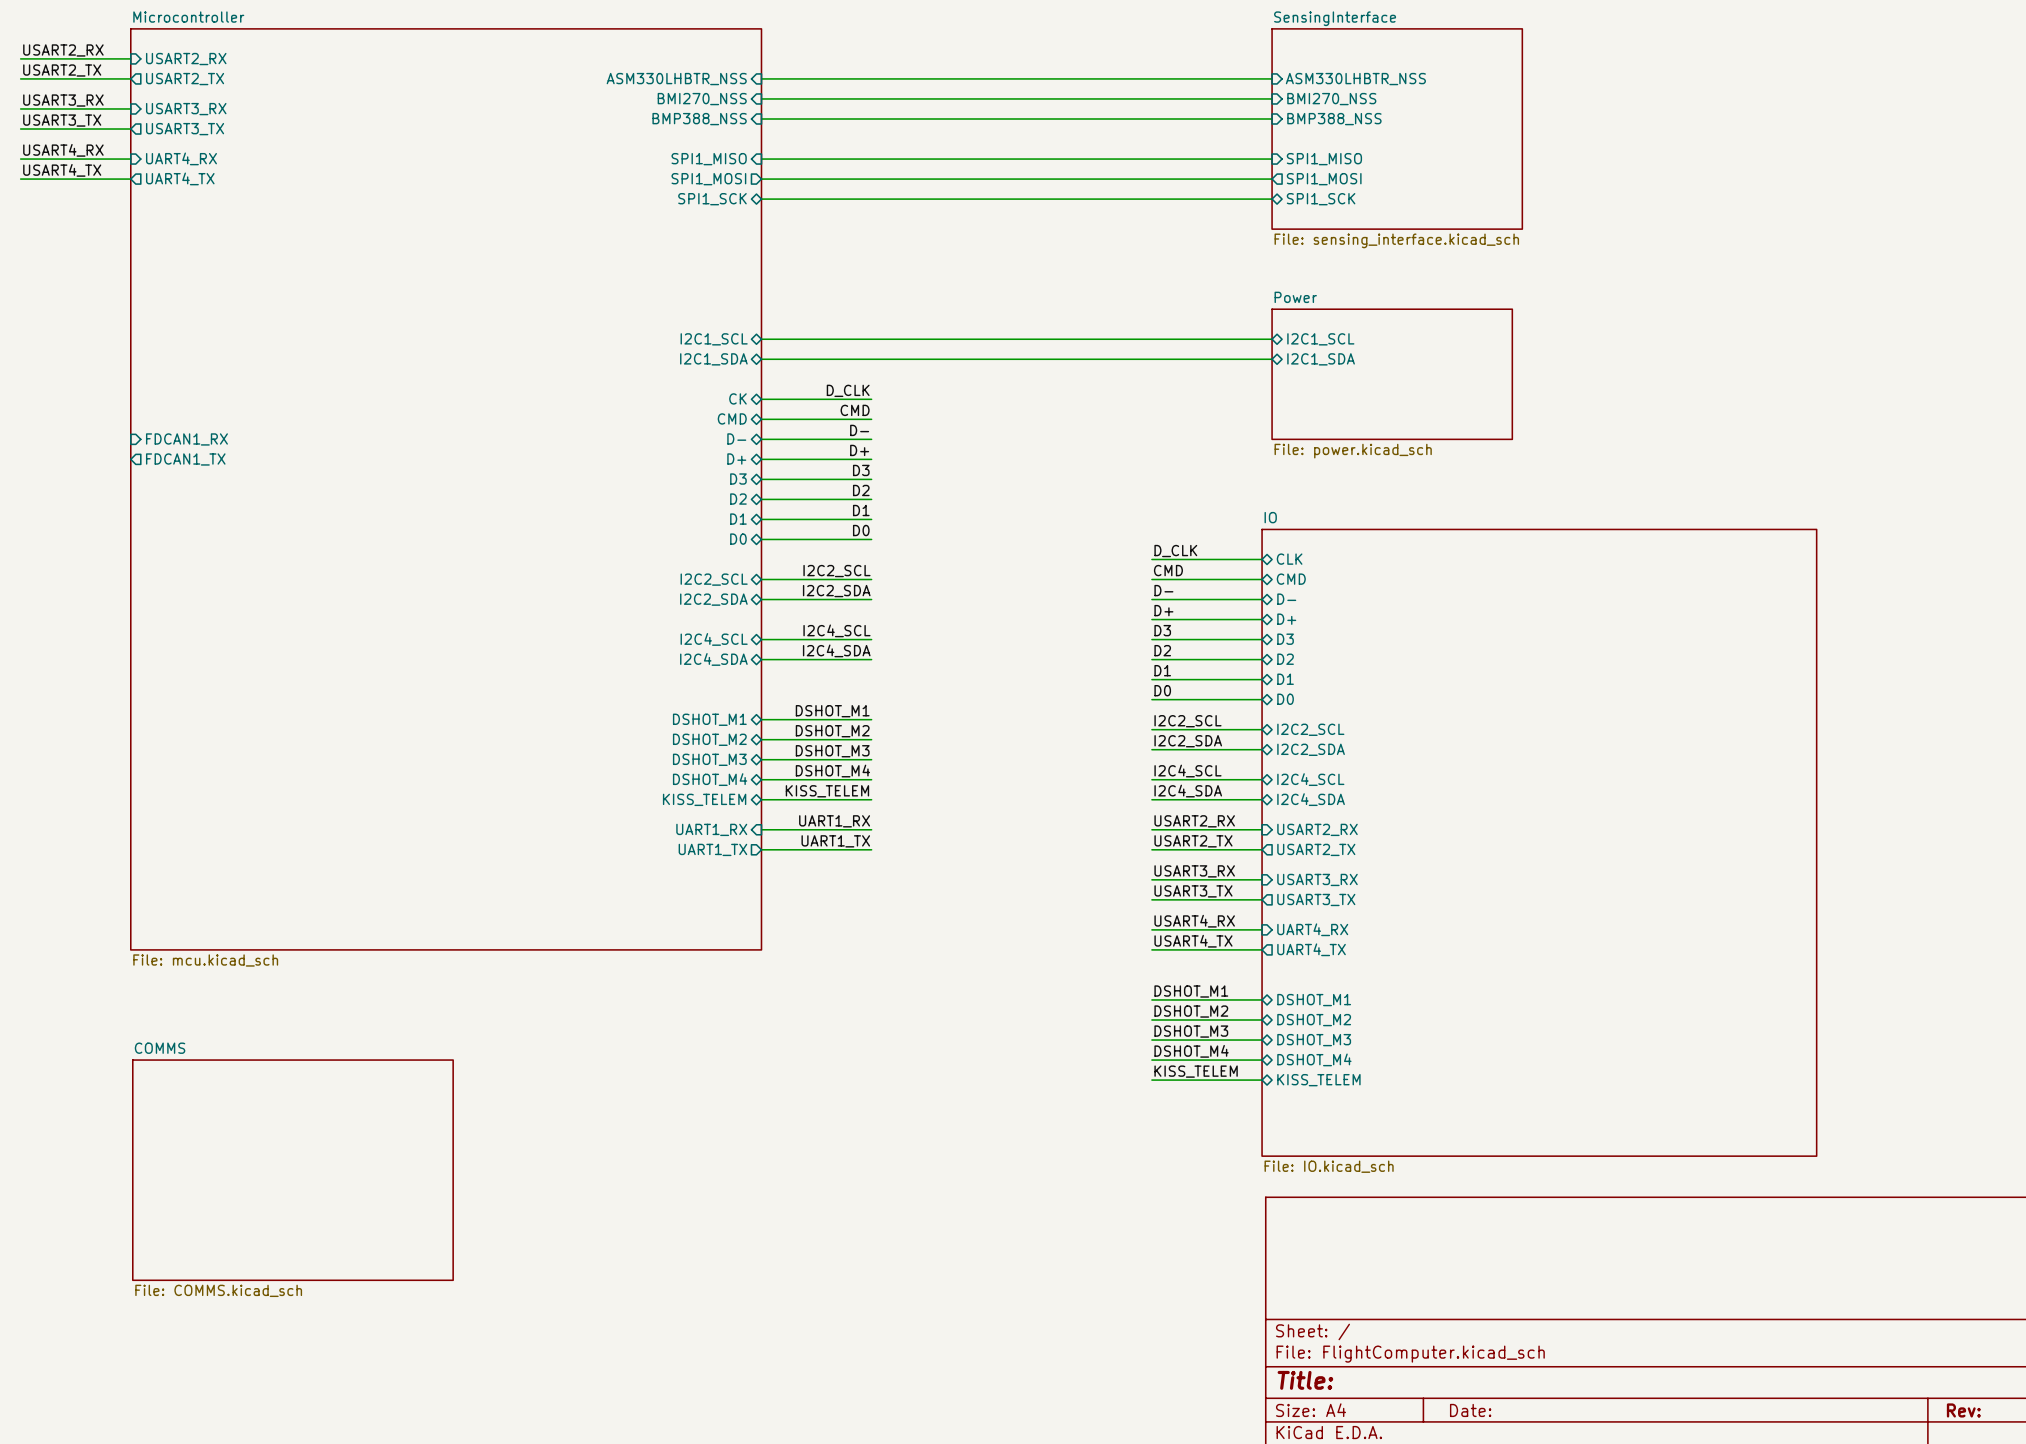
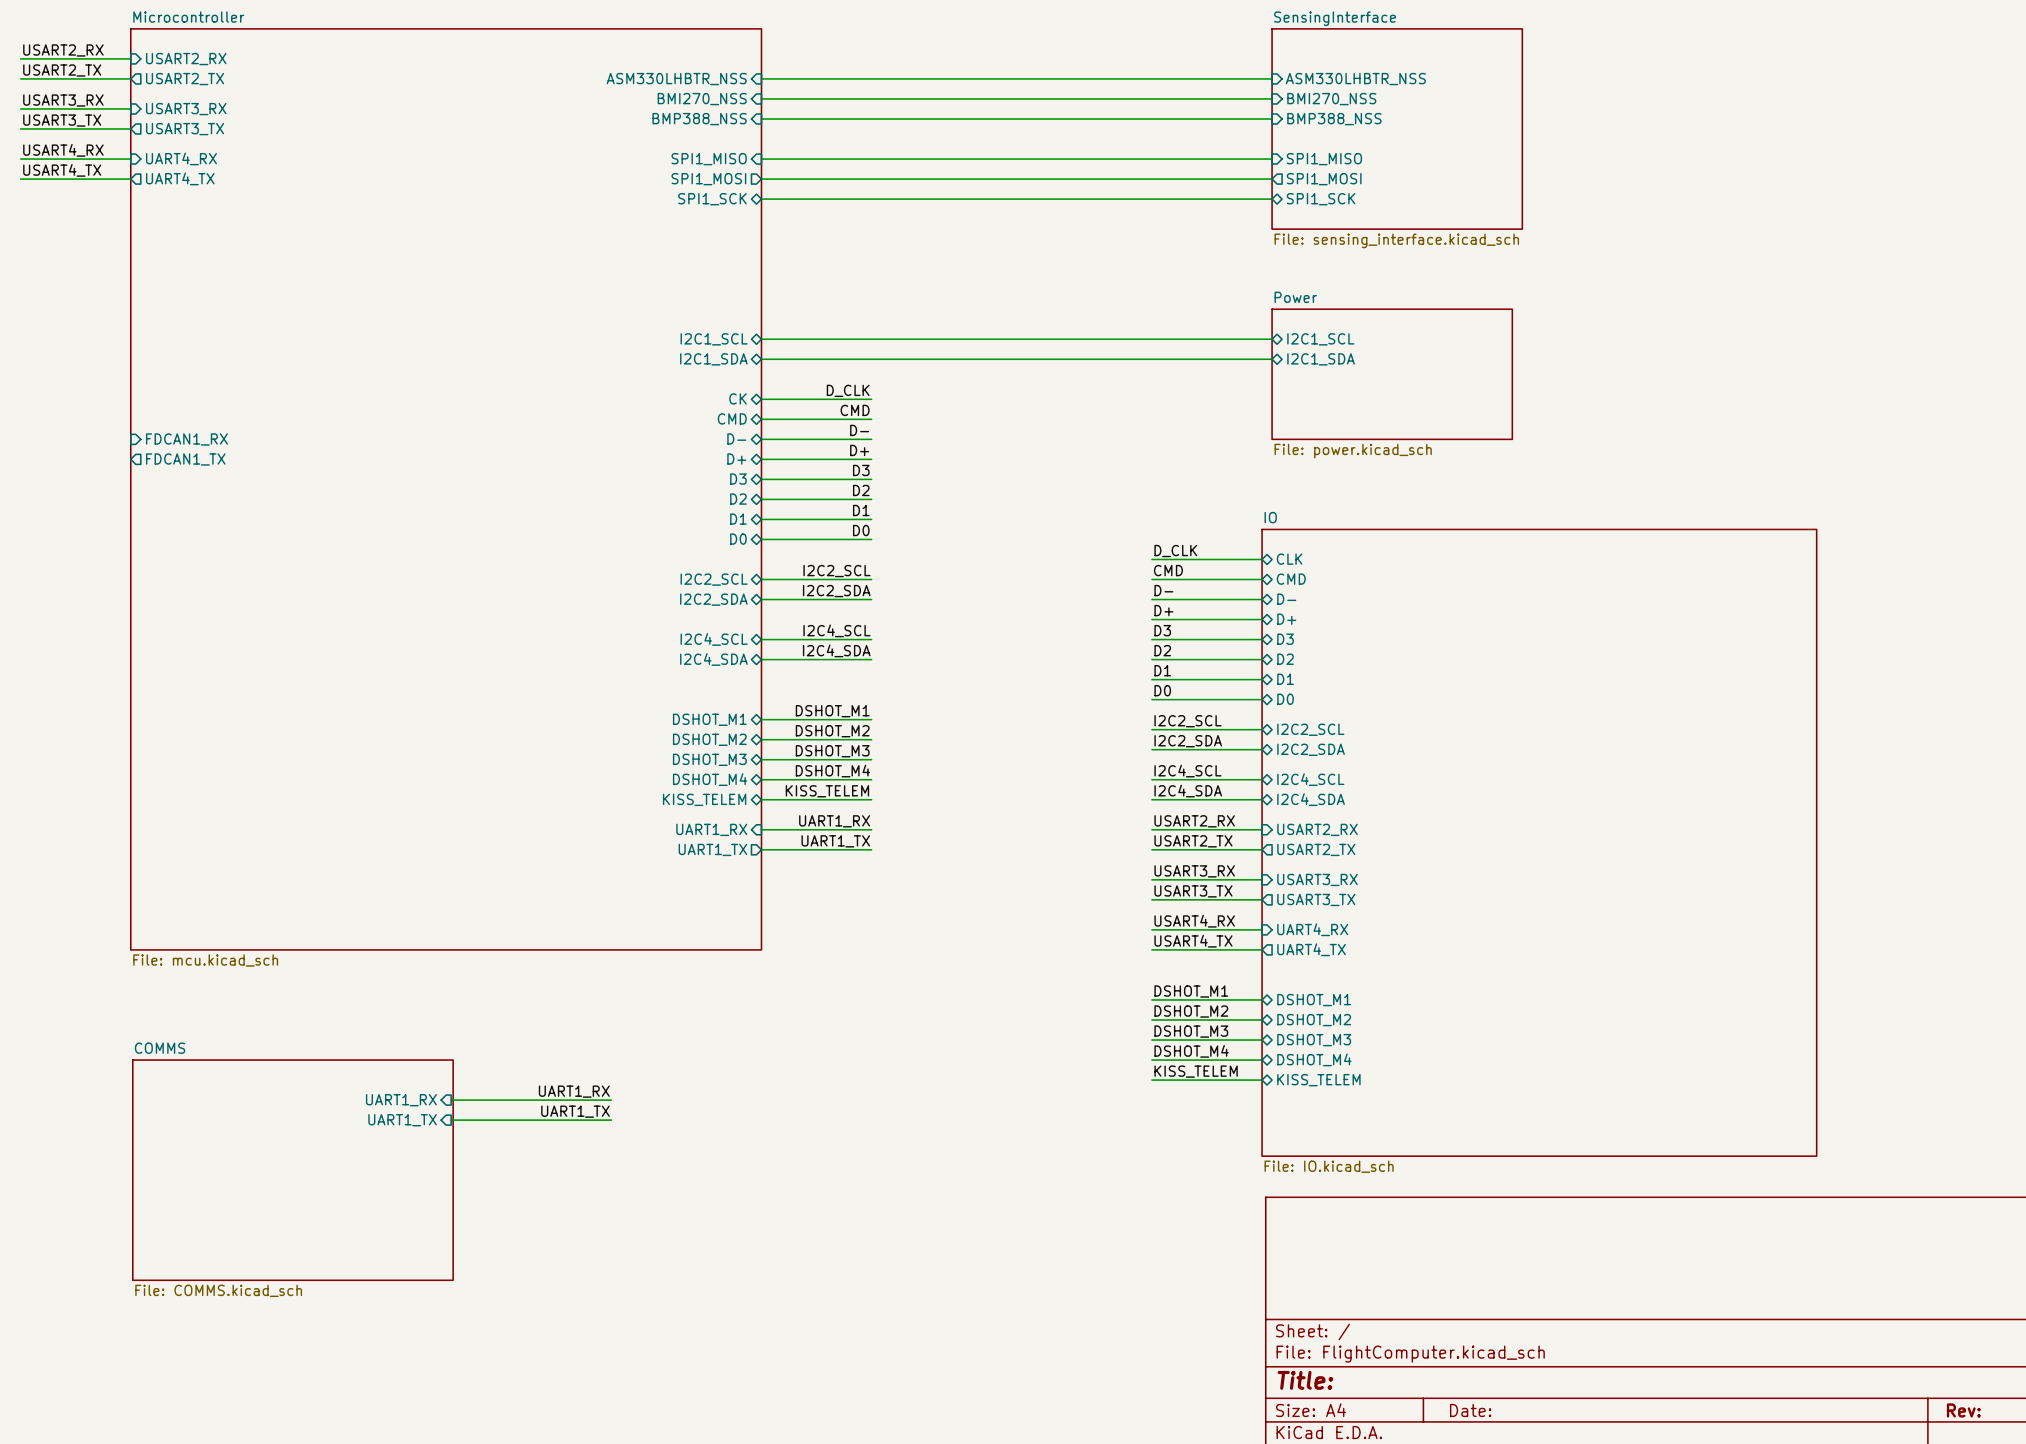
label: none -> UART1_RX (574, 1091)
sheet pin: none -> UART1_RX (401, 1100)
wire: none -> (451, 1100) (611, 1100)
label: none -> UART1_TX (575, 1111)
sheet pin: none -> UART1_TX (402, 1120)
wire: none -> (451, 1120) (611, 1120)

